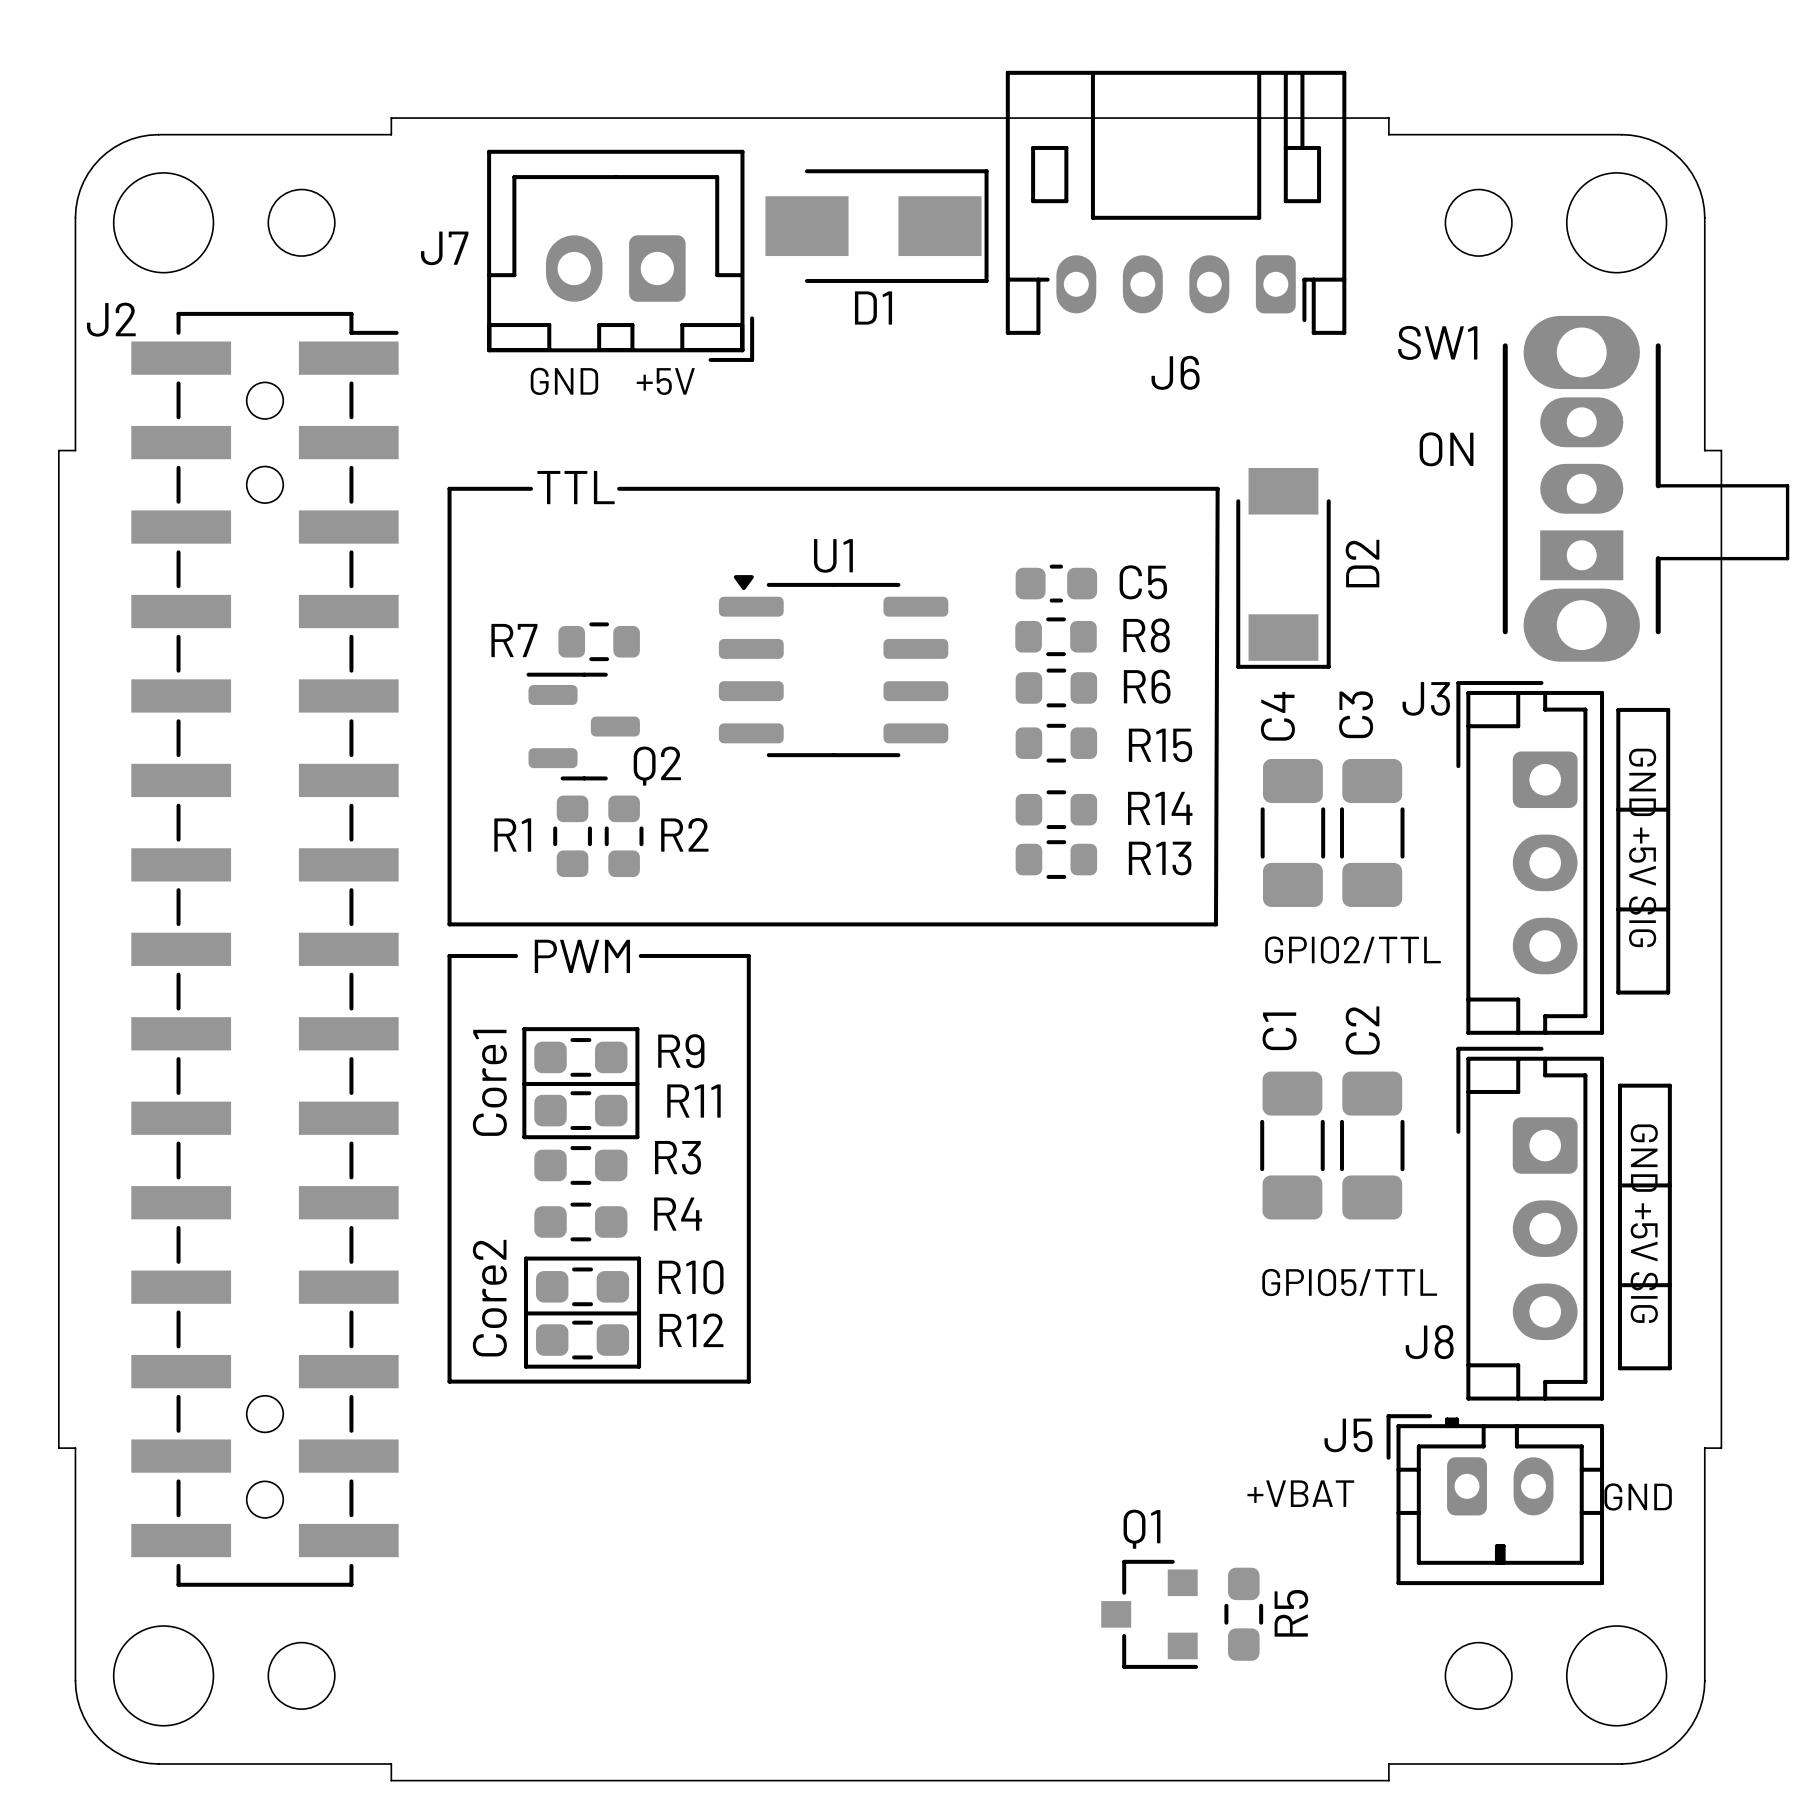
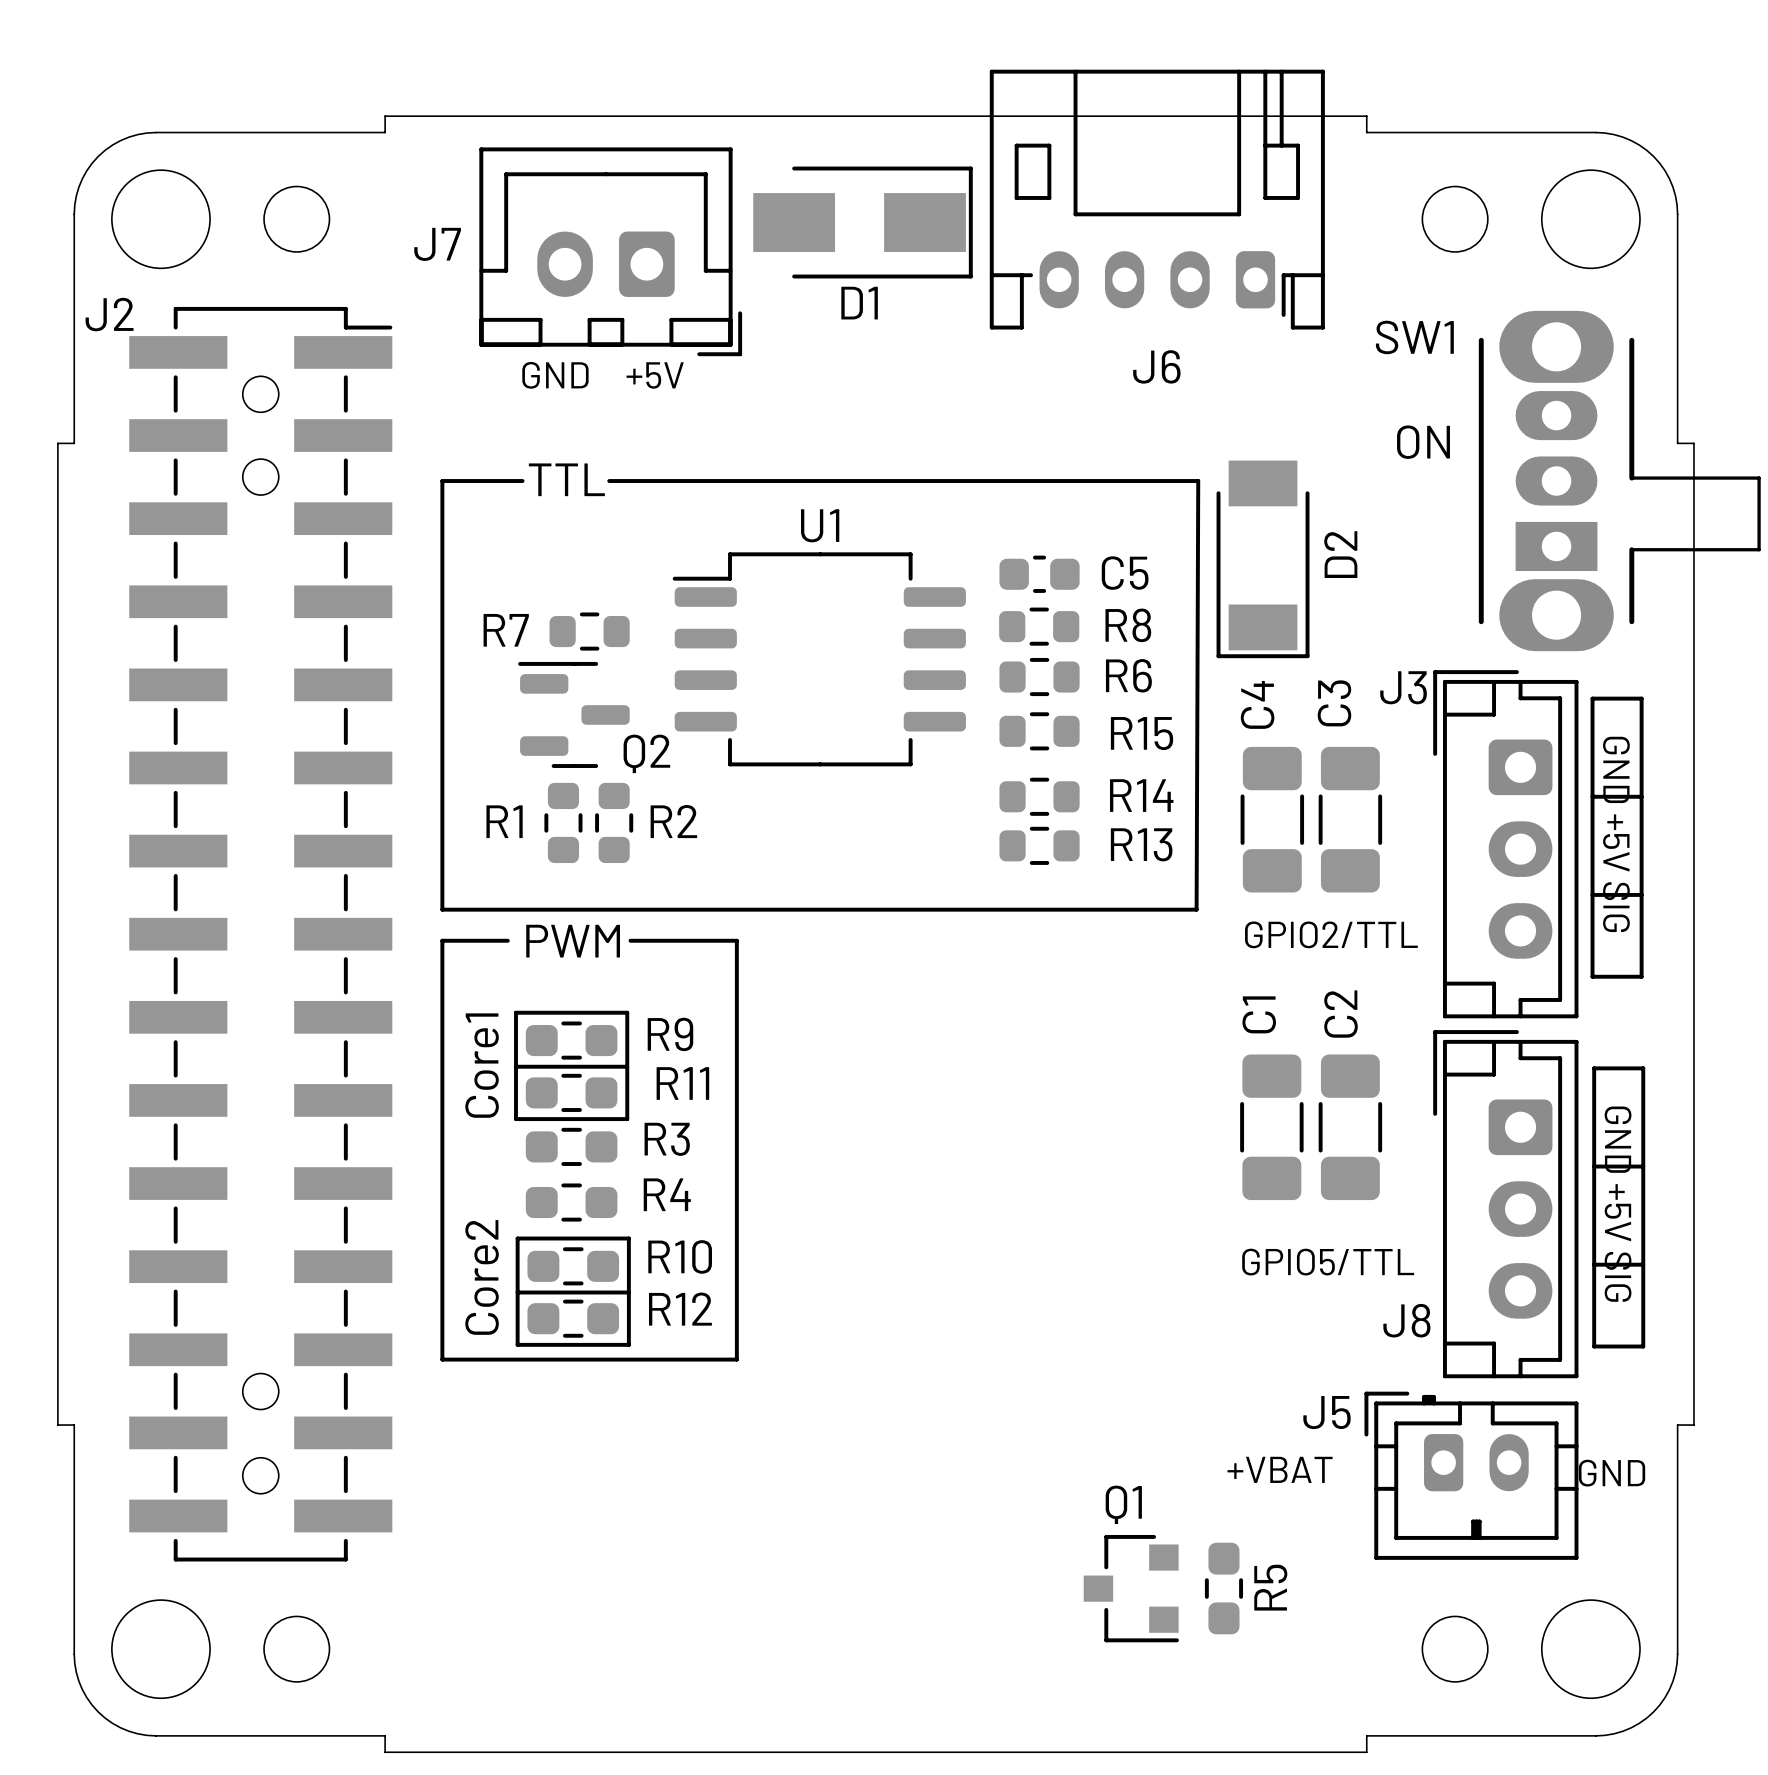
U1 footprint: [718, 575, 949, 758] -> [672, 552, 966, 767]

